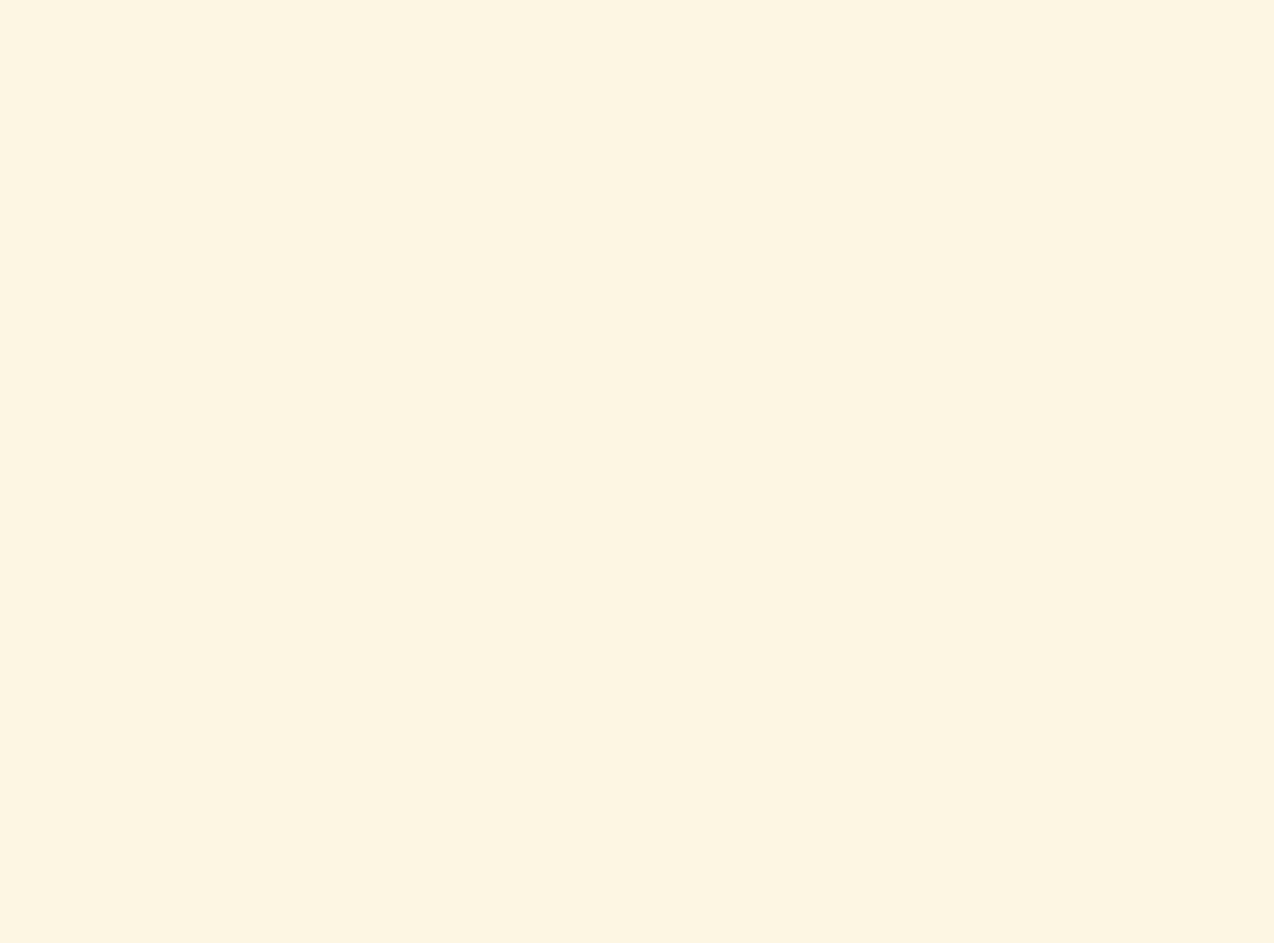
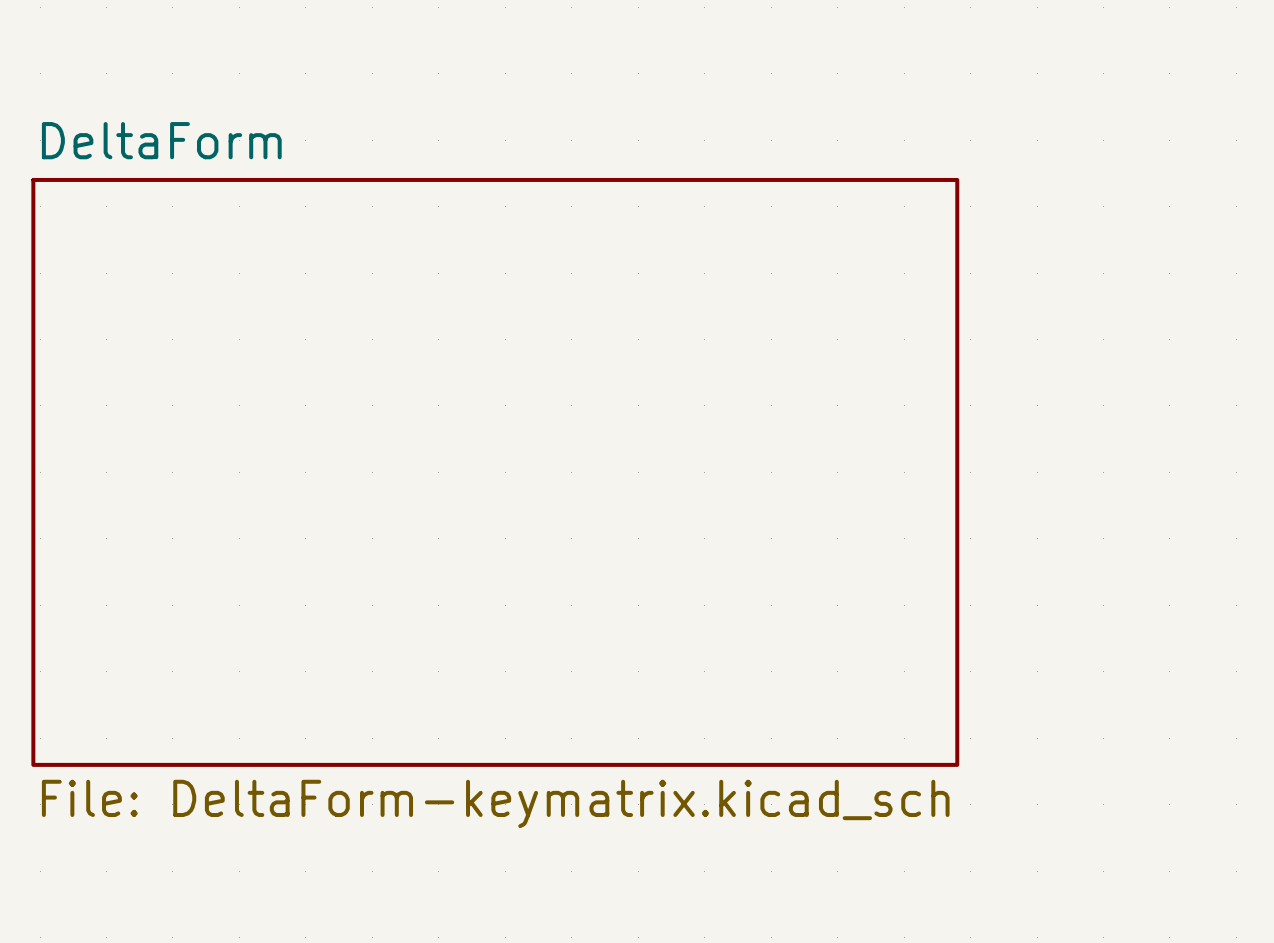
sheet DeltaForm: none -> File: DeltaForm-keymatrix.kicad_sch (495, 472)

